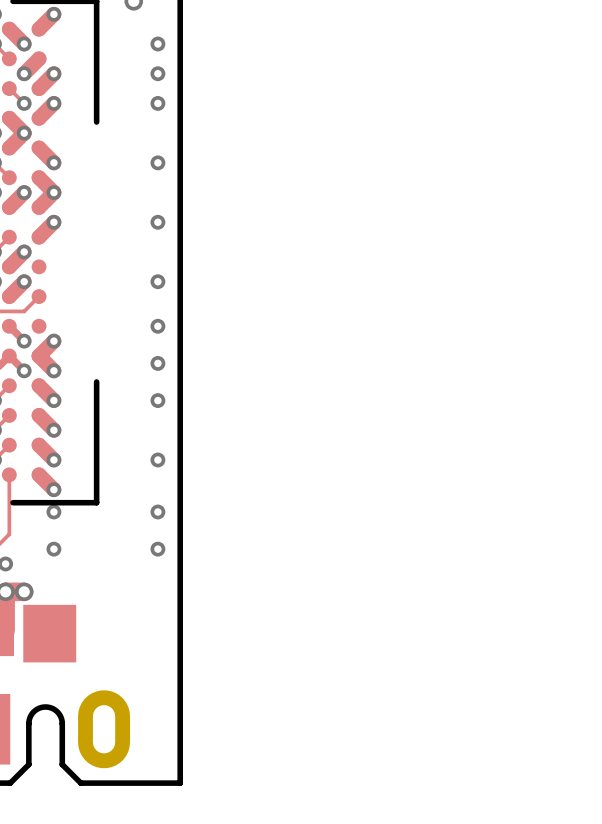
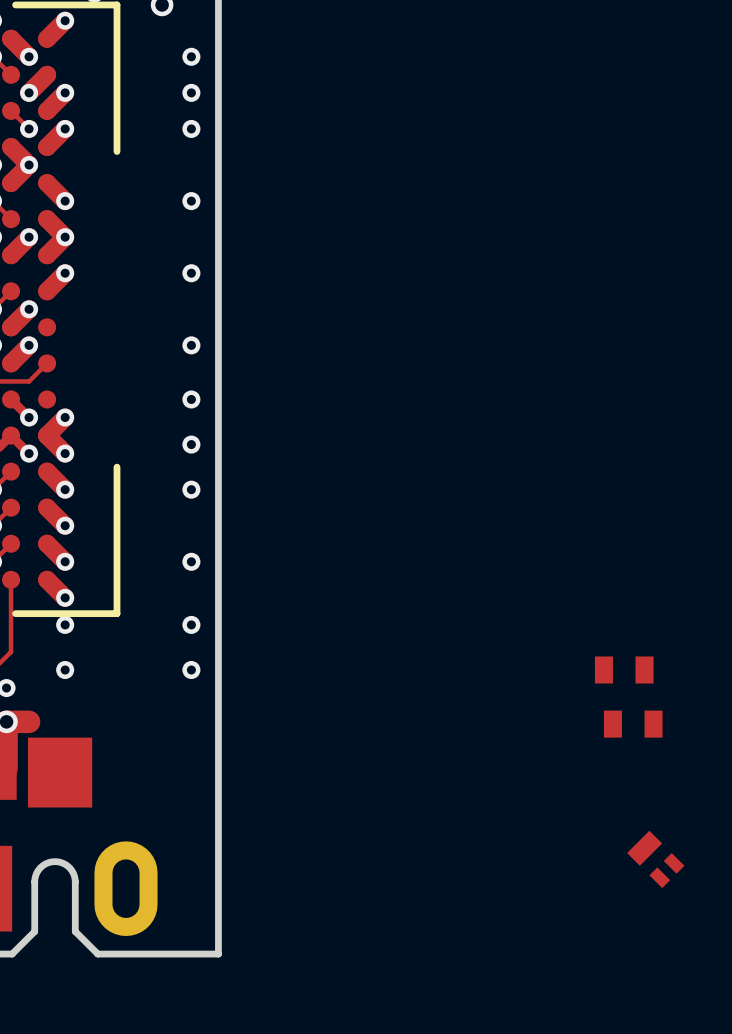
part: none -> (624, 670)
via: (24, 591) -> none
part: none -> (633, 724)
part: none -> (655, 859)

